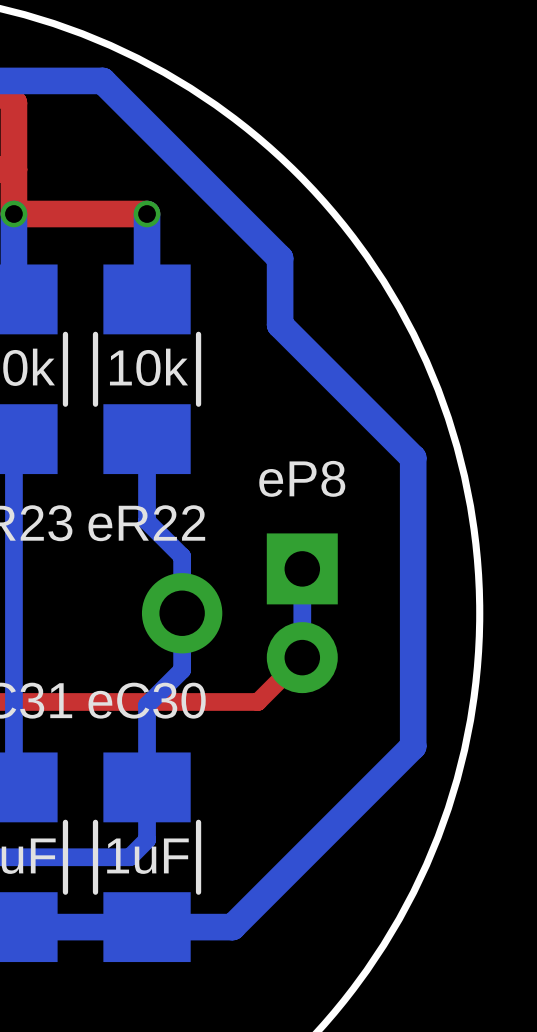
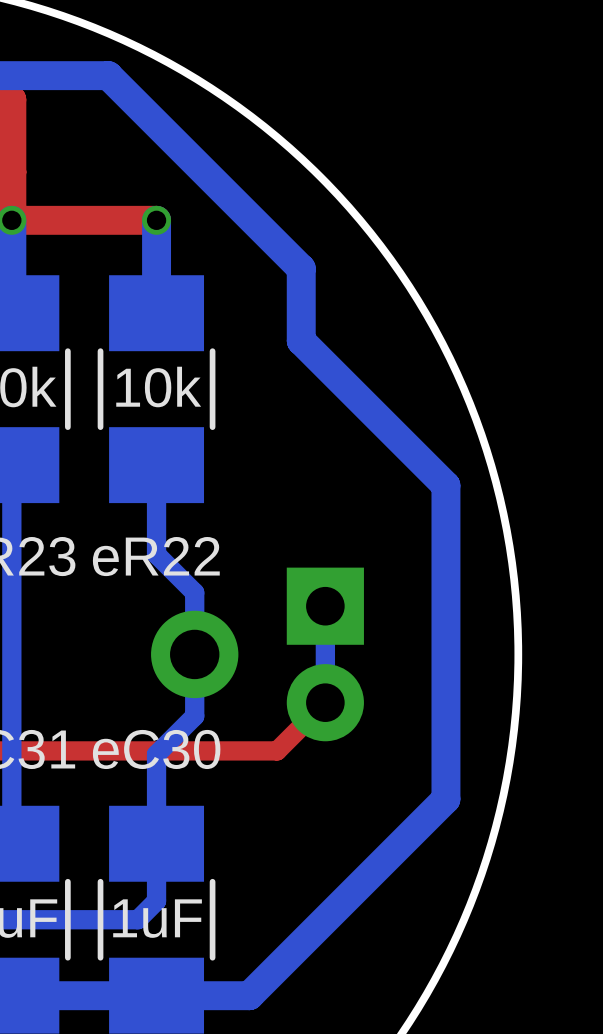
eP8 name: eP8 (302, 478) -> none

